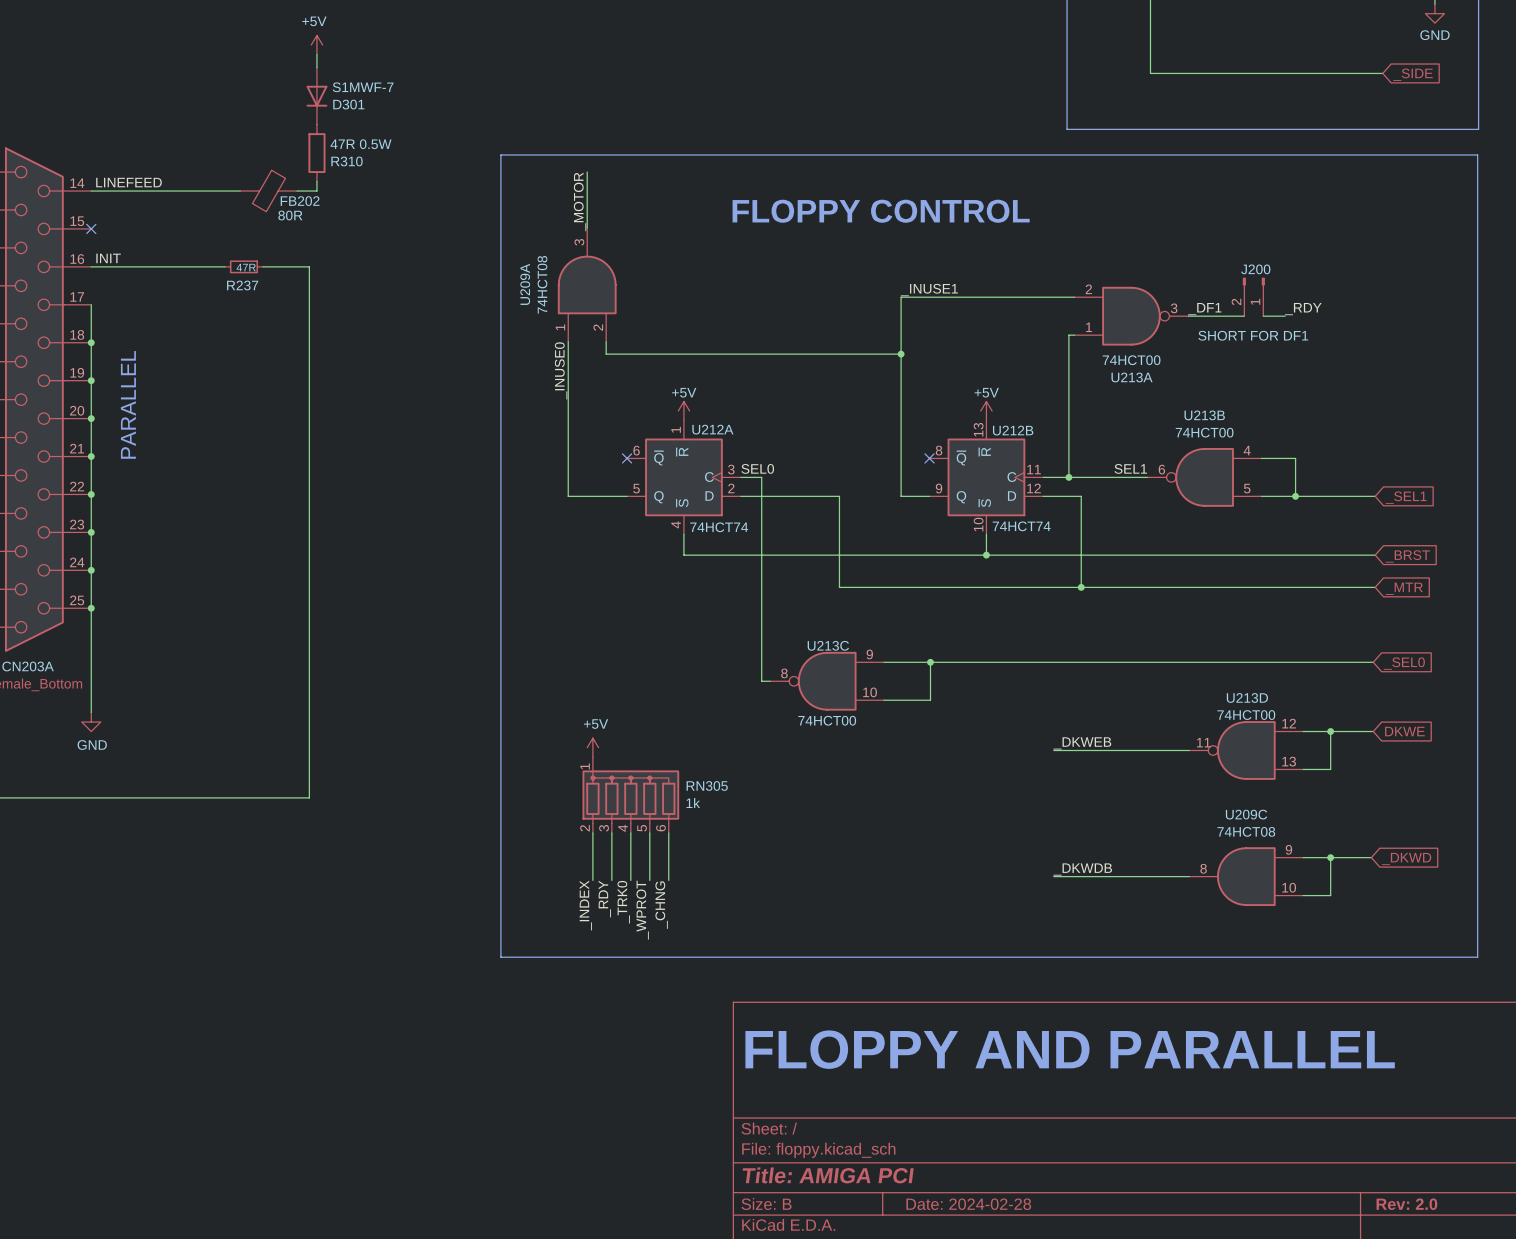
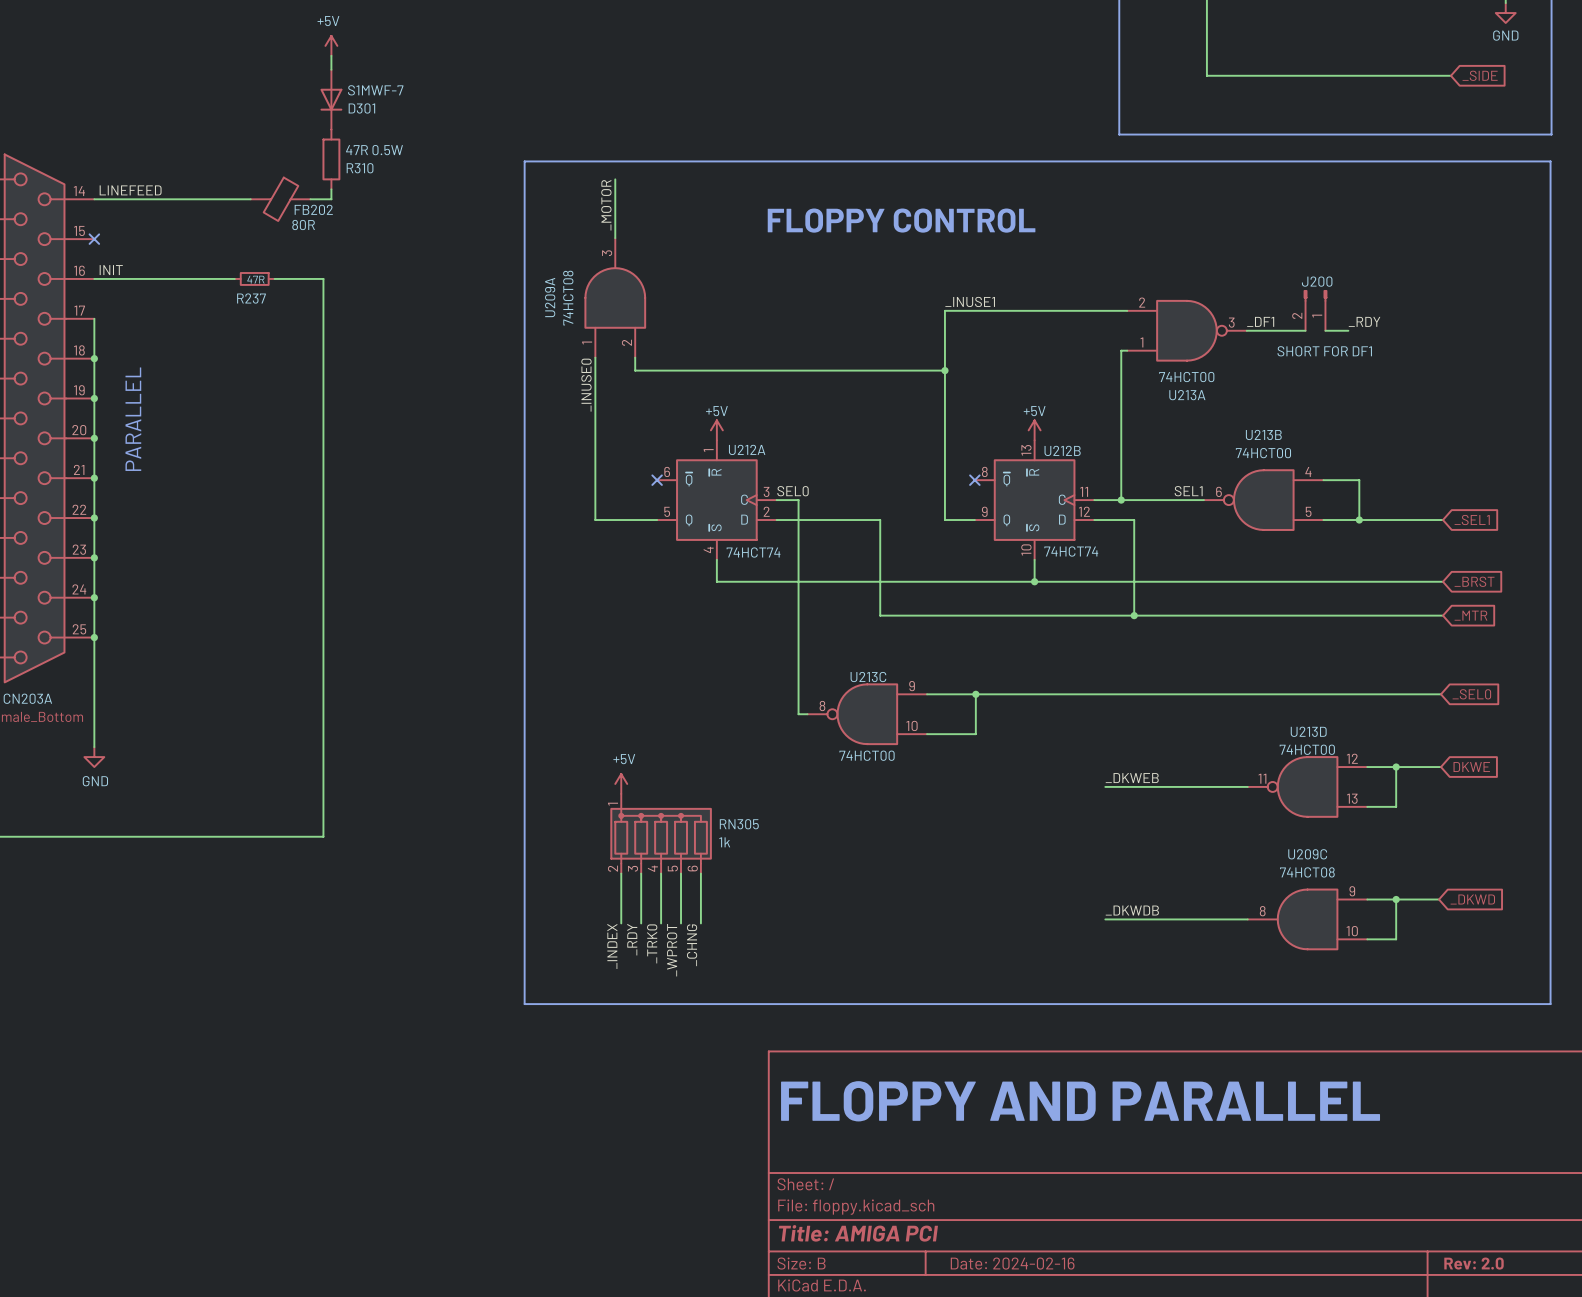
title block: Date: 2024-02-28 (968, 1204) -> Date: 2024-02-16 (1012, 1263)

